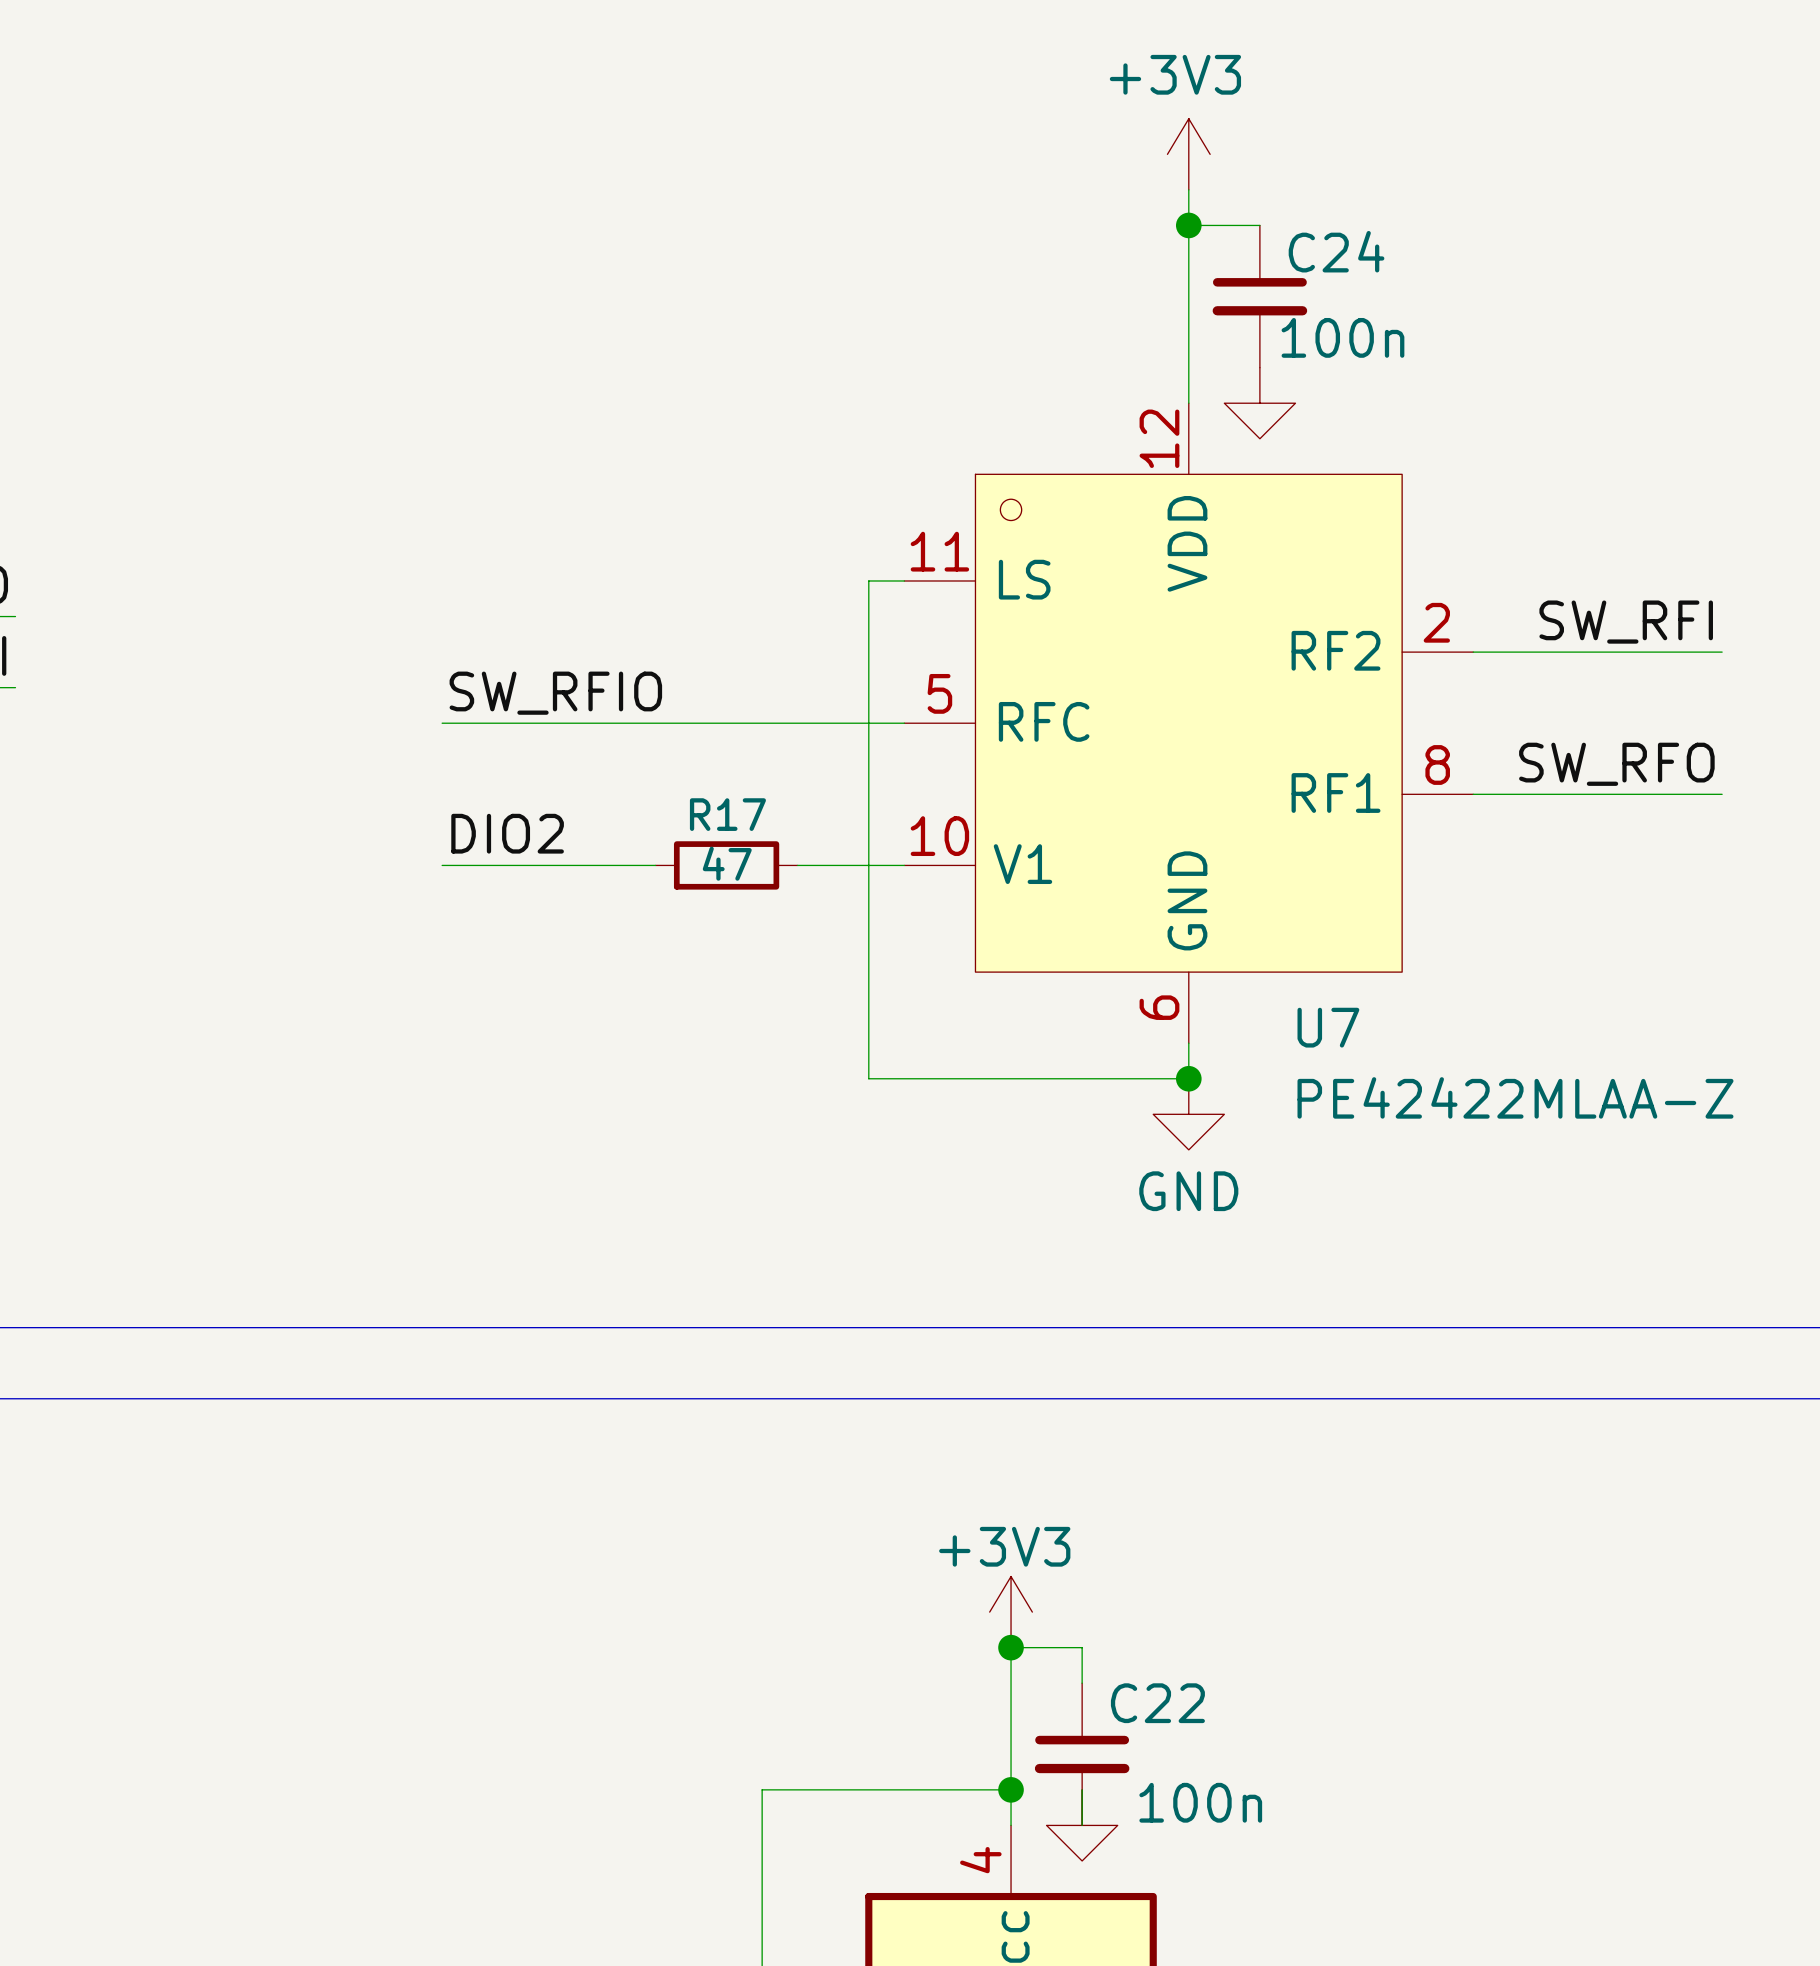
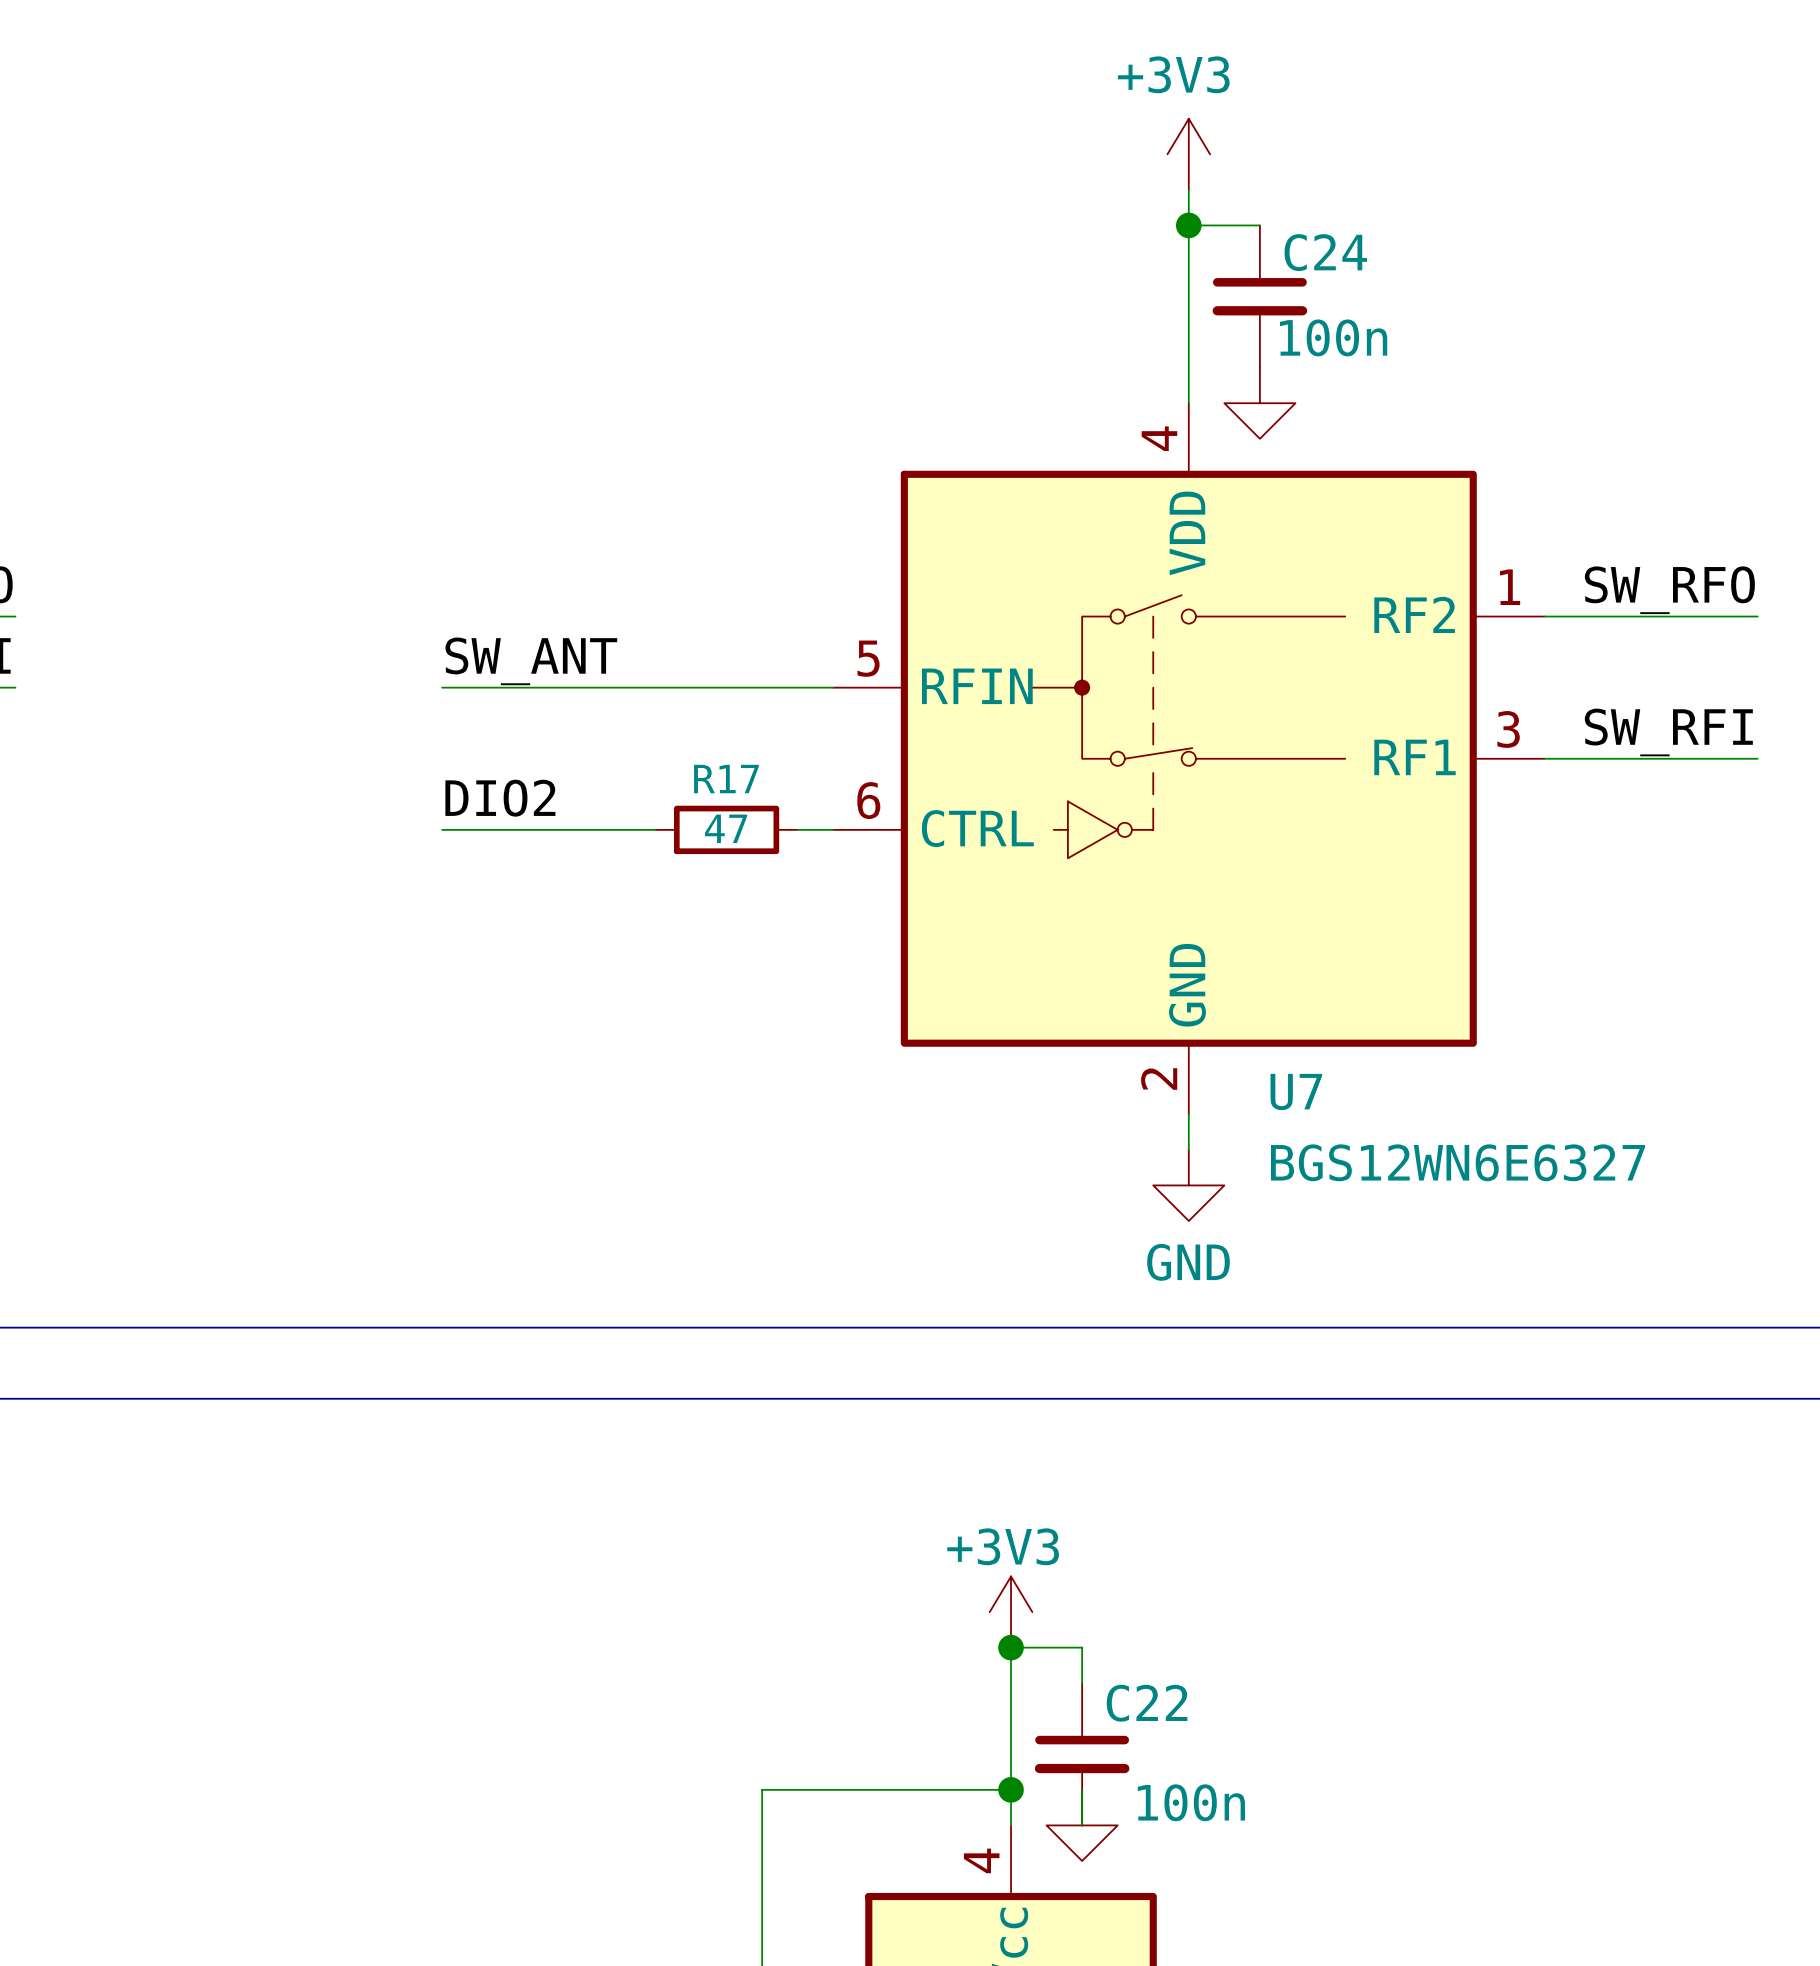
U7 symbol: [904, 403, 1474, 1044] -> [833, 403, 1545, 1115]
wire: (904, 580) (868, 580) (868, 1078) (1188, 1078) (1188, 1043) -> none
wire: none -> (1544, 616) (1757, 616)
label position: SW_RFI (1626, 622) -> SW_RFI (1668, 732)
wire: (1473, 652) (1722, 652) -> none
label: none -> SW_ANT (531, 661)
wire: none -> (442, 687) (833, 687)
label: SW_RFIO (555, 693) -> none
wire: (442, 723) (904, 723) -> none
wire: none -> (1544, 758) (1757, 758)
label position: SW_RFO (1616, 764) -> SW_RFO (1669, 590)
wire: (1473, 794) (1722, 794) -> none
wire: none -> (797, 829) (833, 829)
label position: DIO2 (507, 833) -> DIO2 (500, 798)
wire: (442, 865) (655, 865) -> (442, 829) (655, 829)
R17 position: (726, 865) -> (726, 829)
wire: (797, 865) (904, 865) -> none
junction: (1188, 1078) -> none
U7 value: PE42422MLAA-Z (1515, 1097) -> BGS12WN6E6327 (1458, 1162)
wire: none -> (1188, 1114) (1188, 1149)
power symbol position: GND (1188, 1114) -> GND (1188, 1185)

